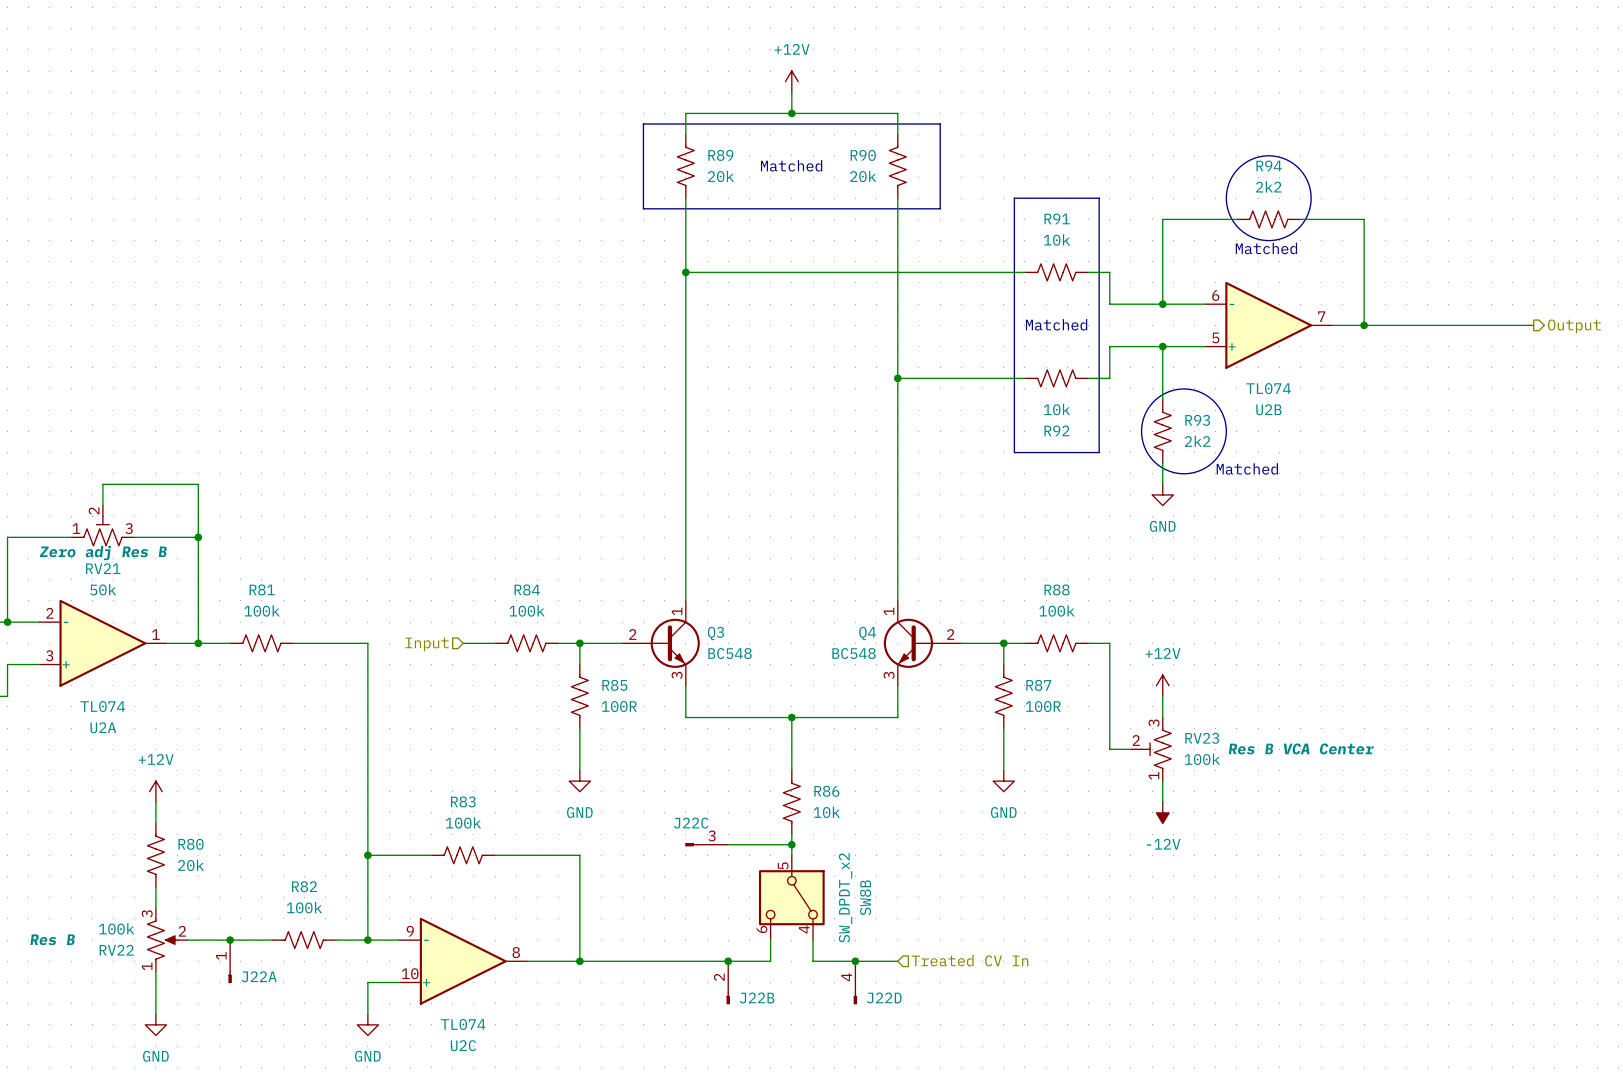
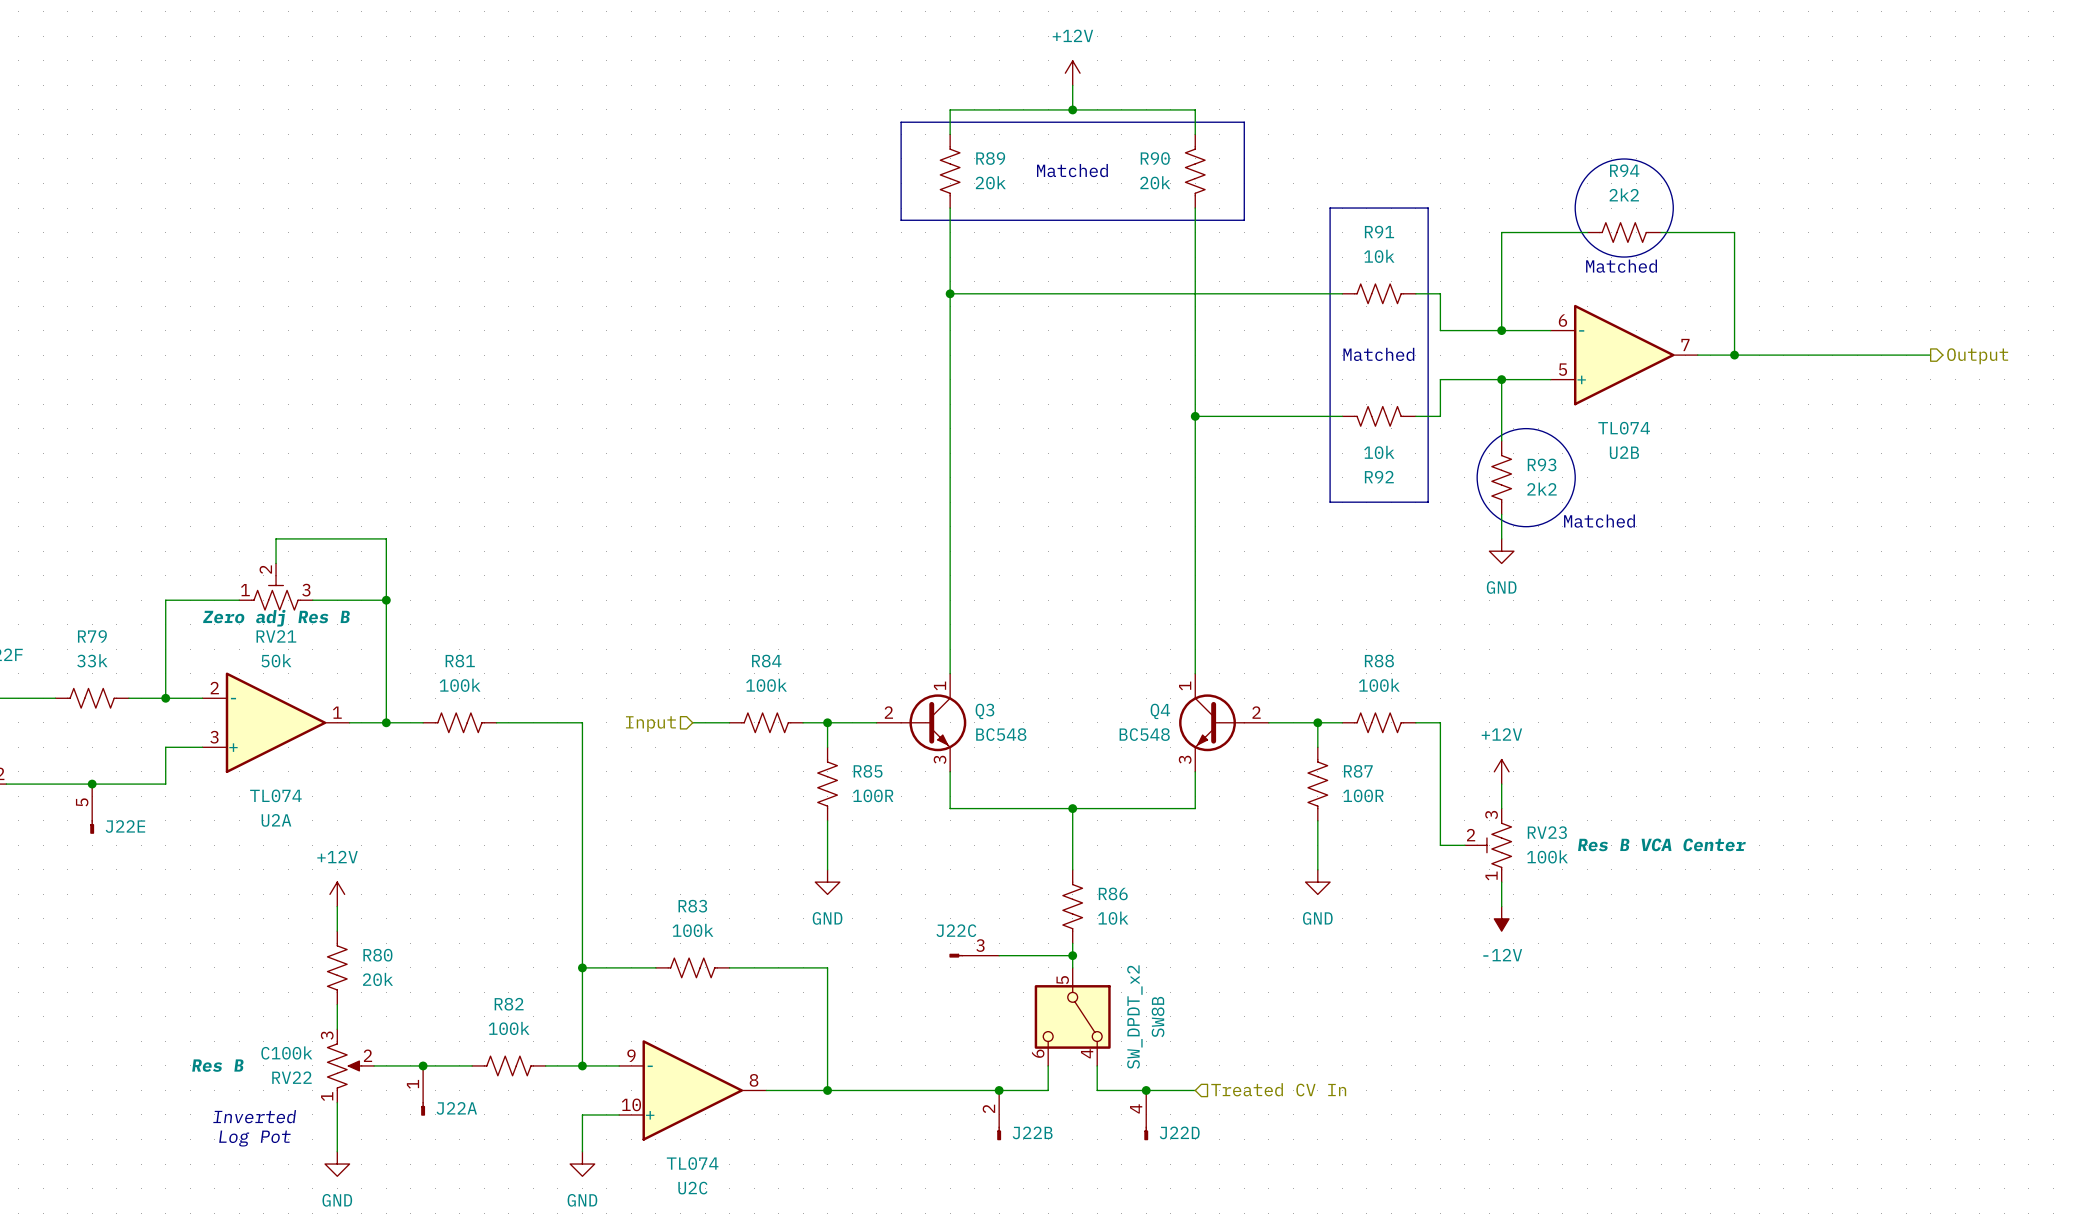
RV22 value: 100k (116, 928) -> C100k (286, 1052)
text: none -> Inverted (254, 1116)
text: none -> Log Pot (254, 1138)

